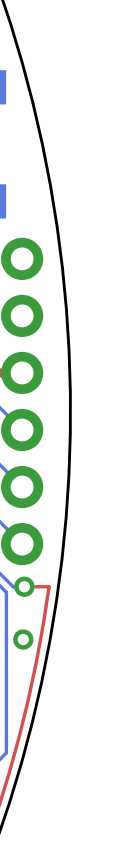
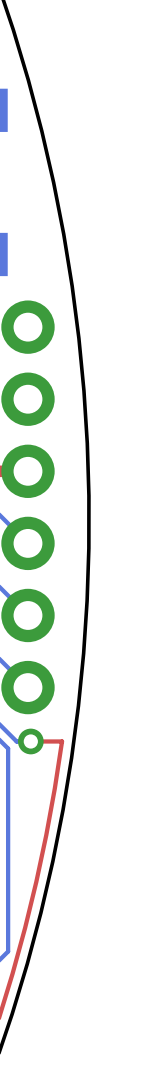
via: (23, 639) -> none

